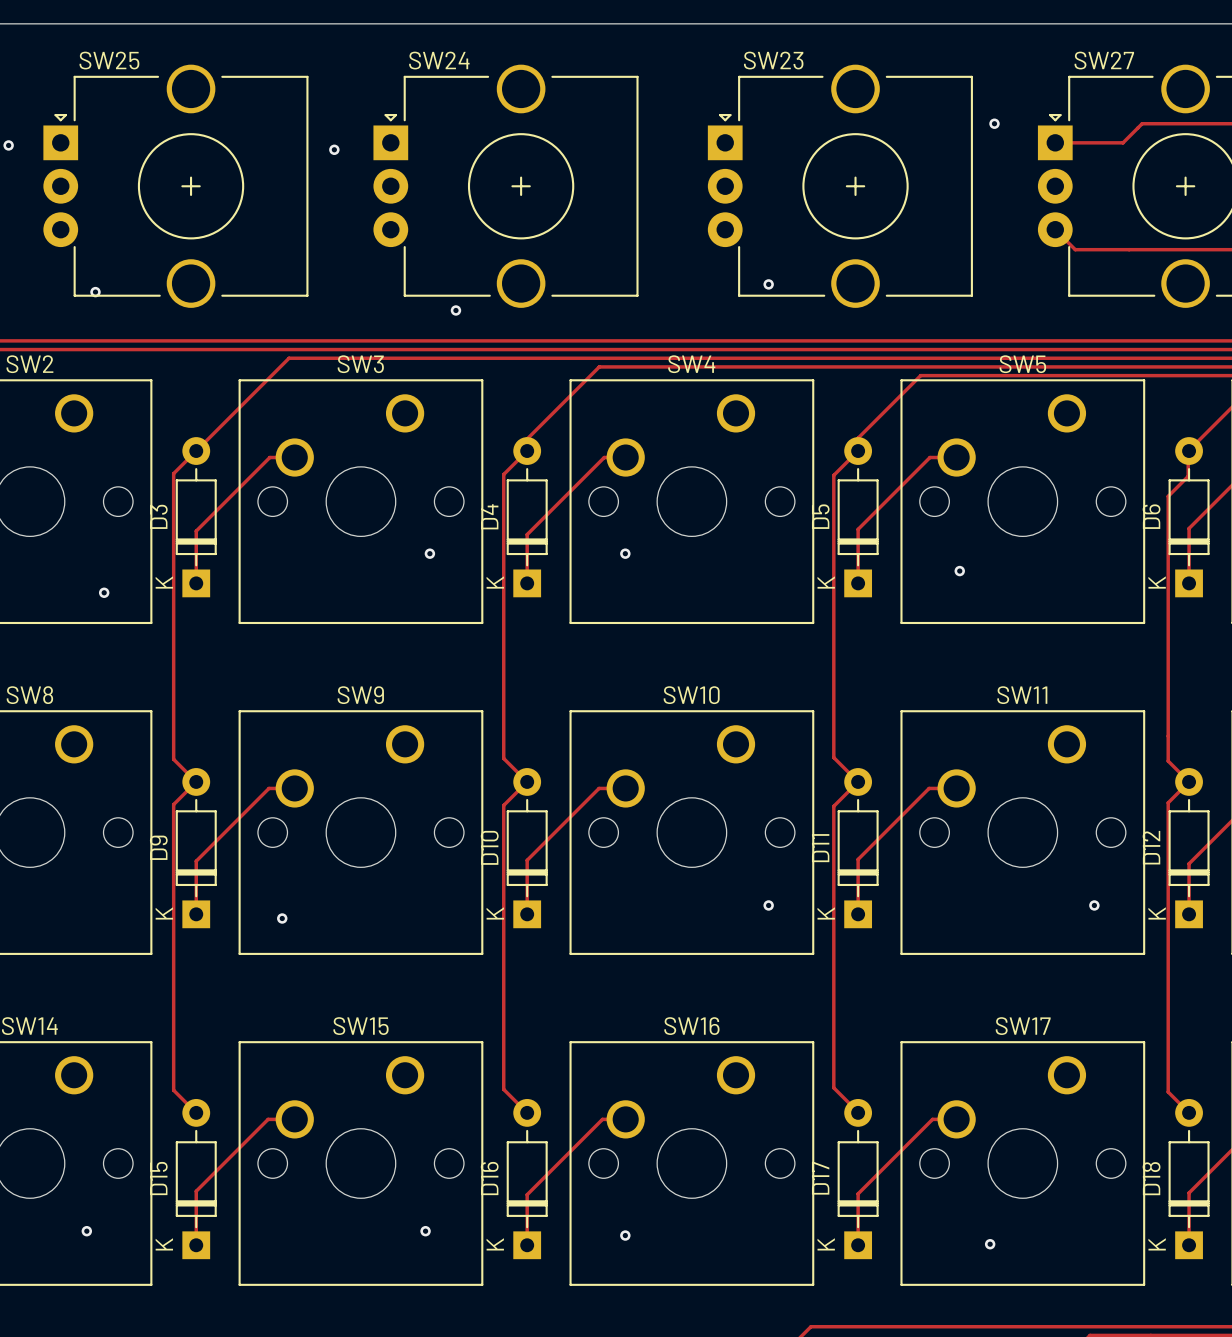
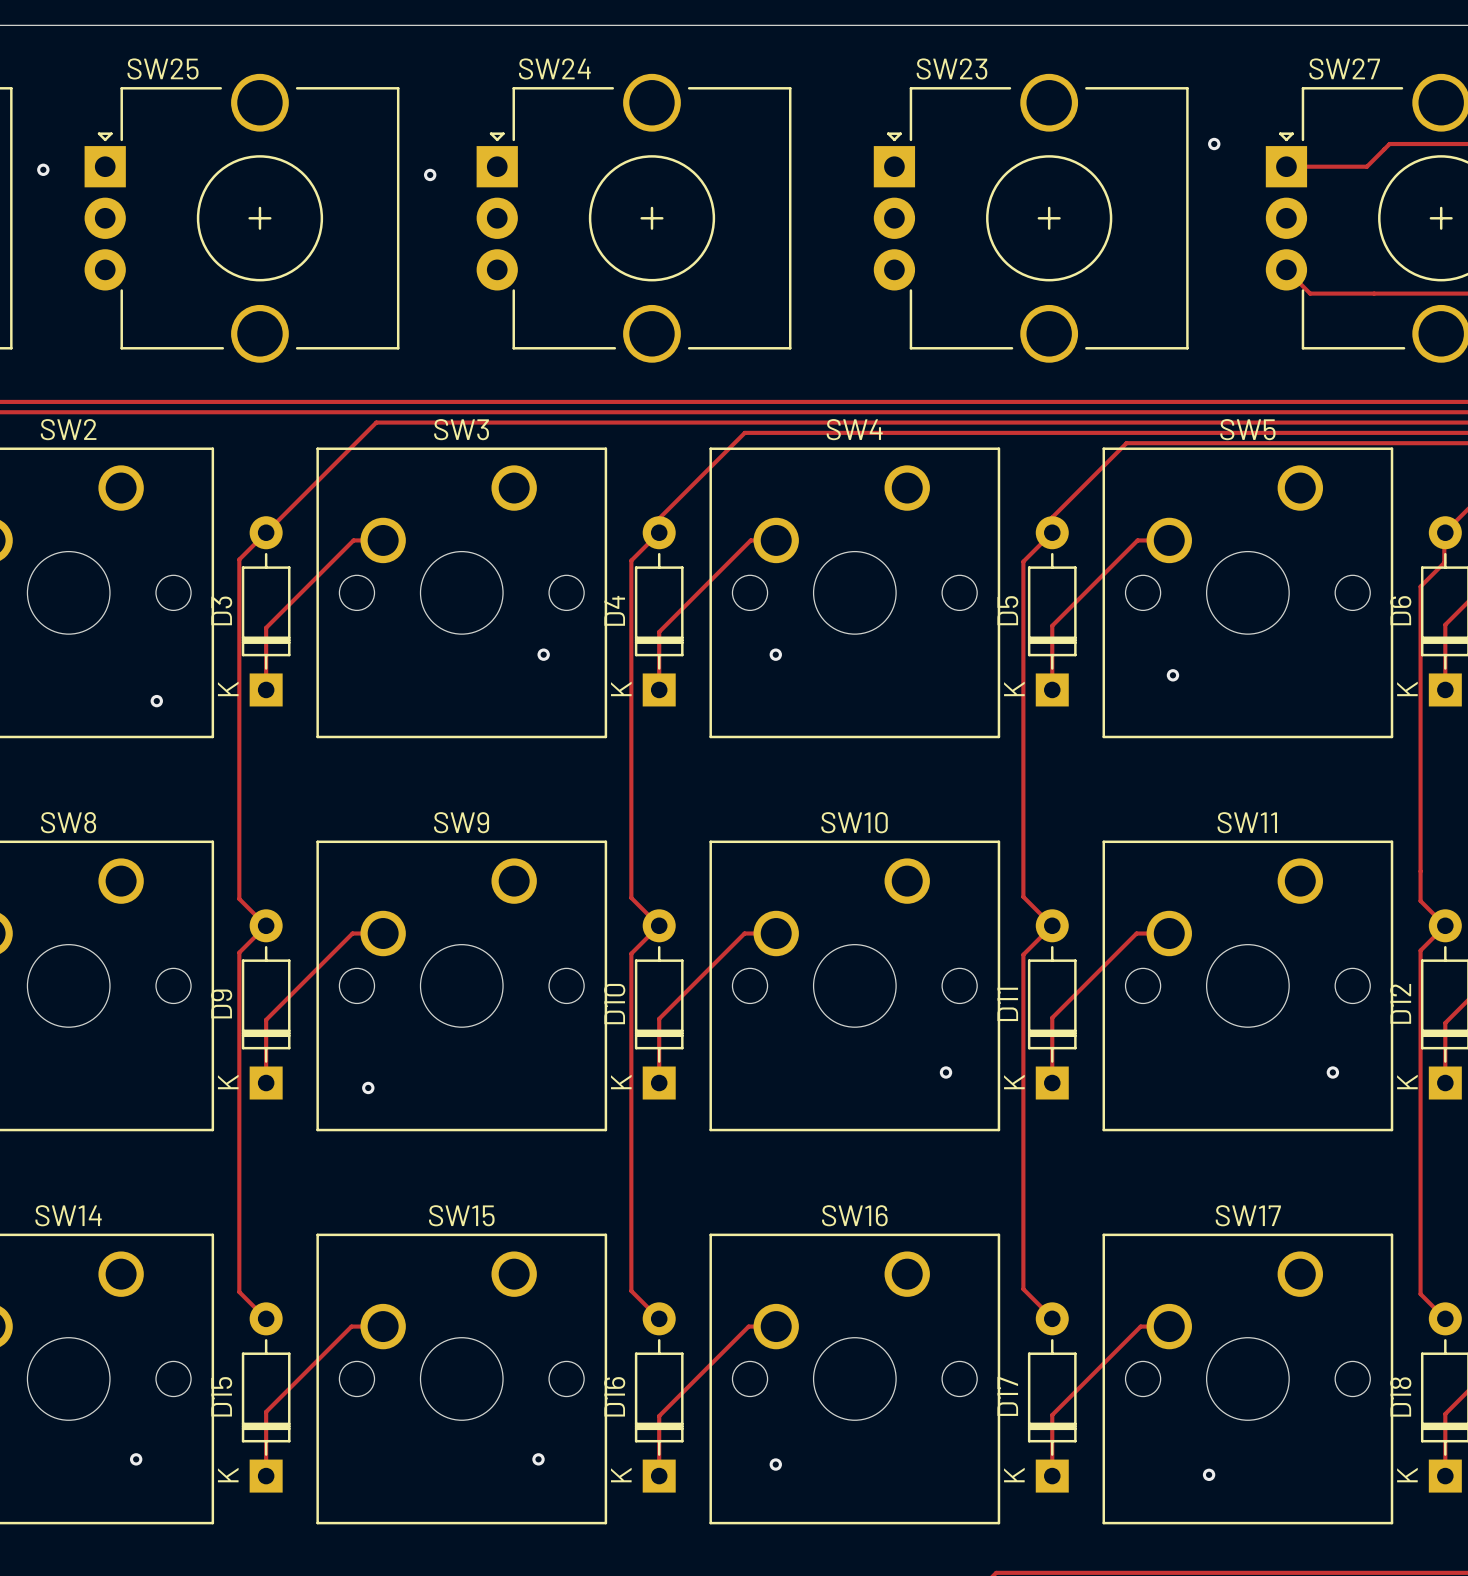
via: (768, 284) -> none
via: (95, 292) -> none
via: (455, 310) -> none

